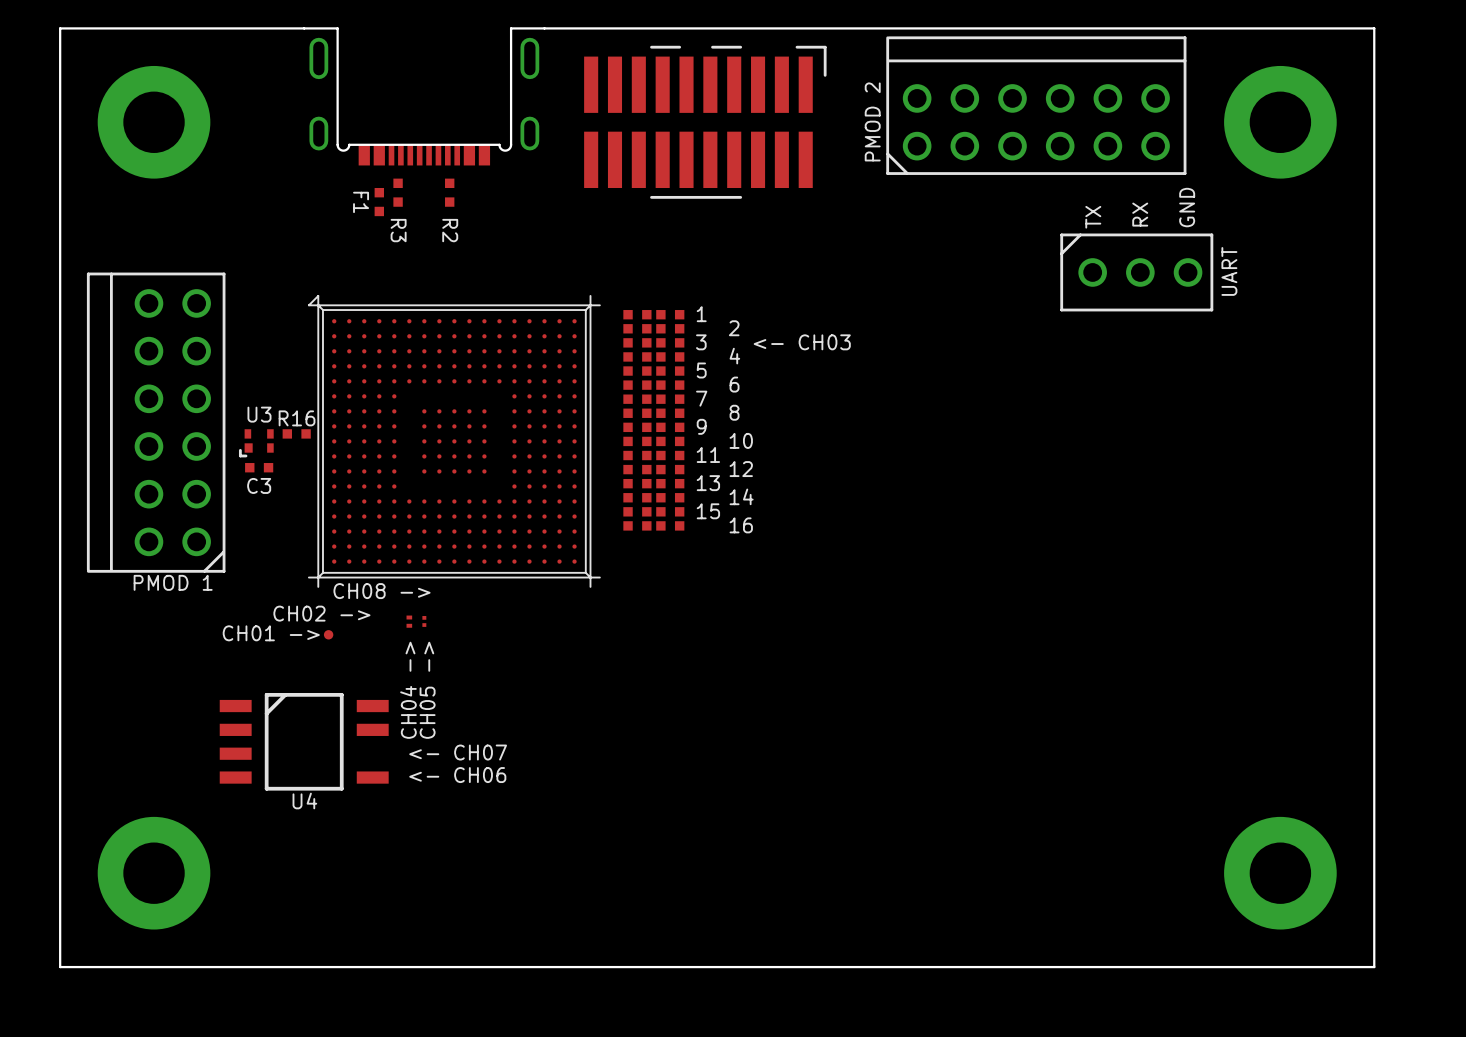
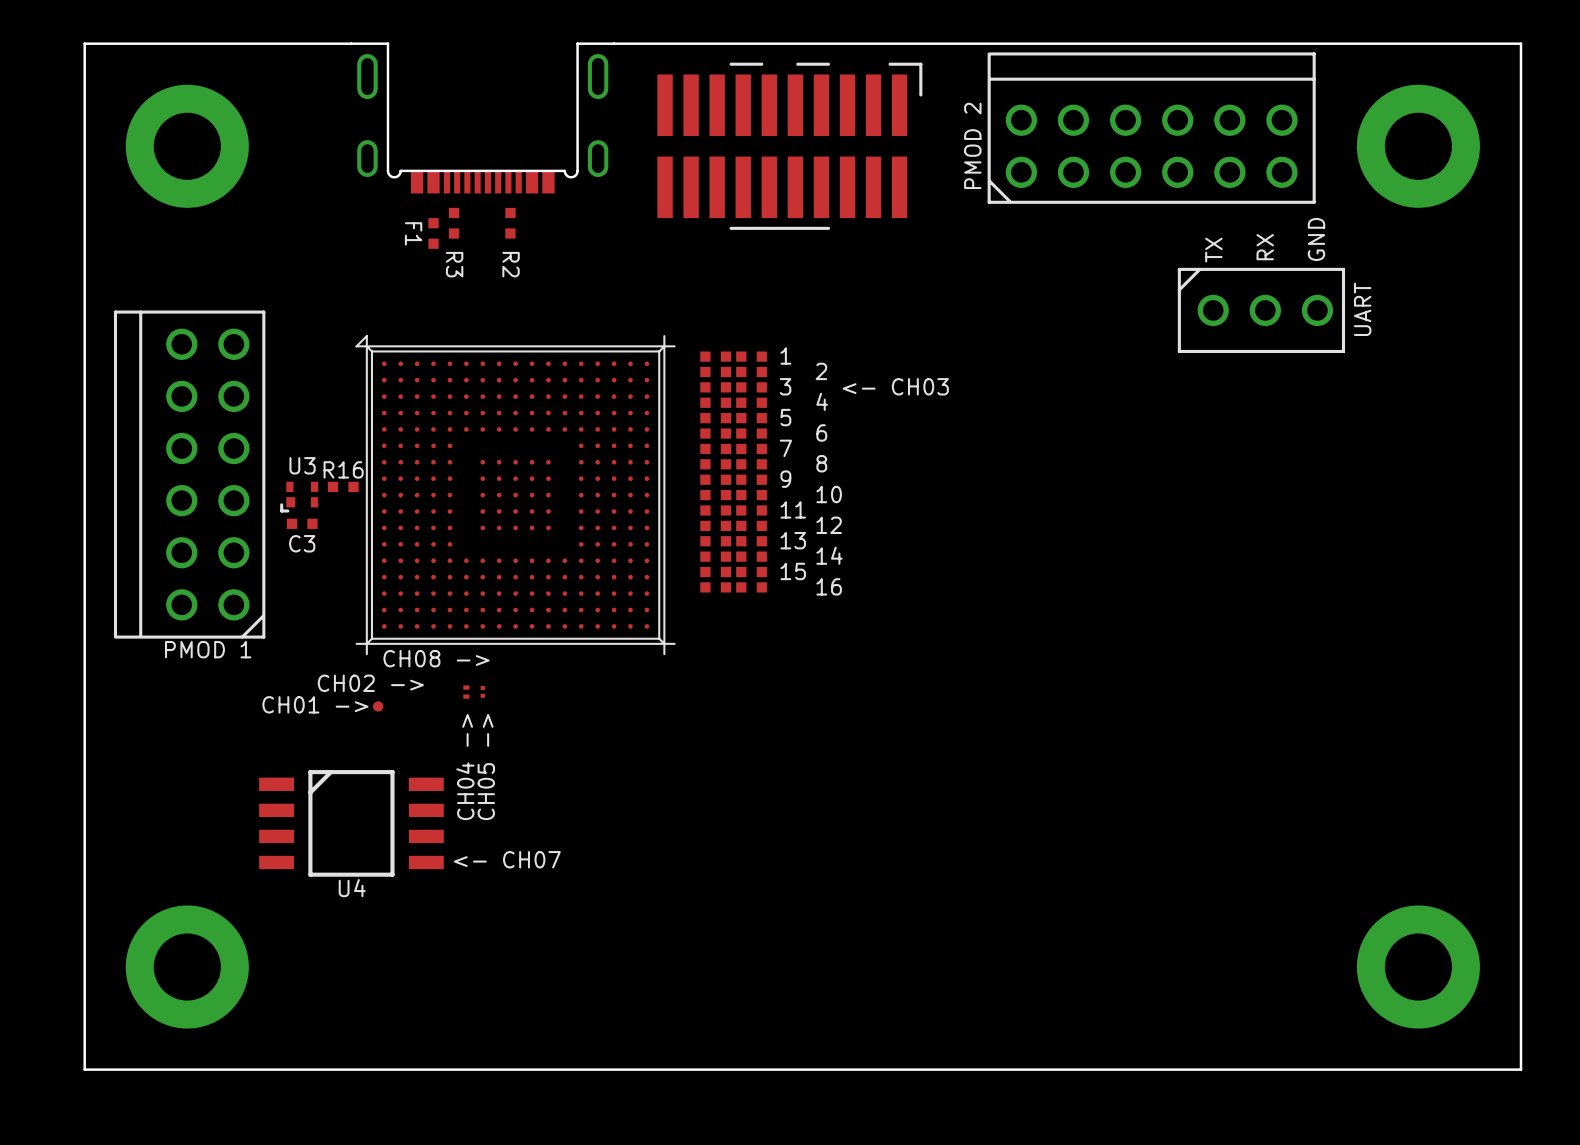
U4 footprint: [219, 692, 389, 791] -> [259, 770, 444, 877]
text: <- CH07 (458, 752) -> none
text: <- CH06 (457, 775) -> <- CH07 (507, 859)

